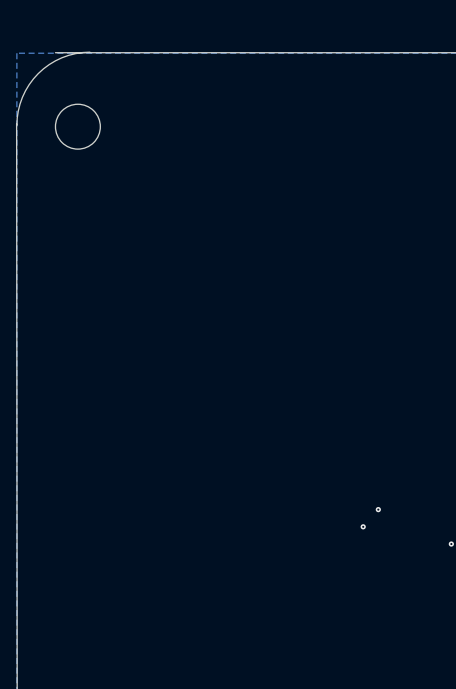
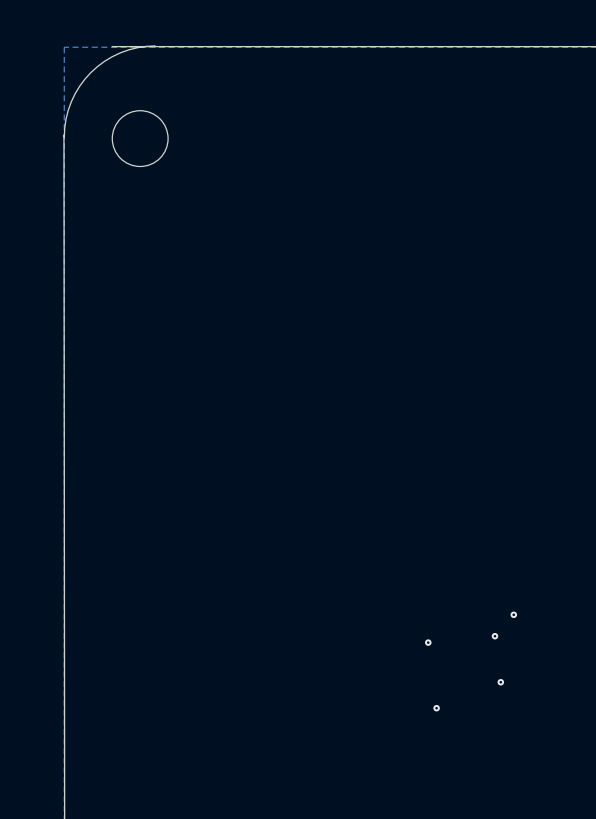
via: none -> (428, 642)
via: none -> (500, 682)
via: none -> (436, 708)

